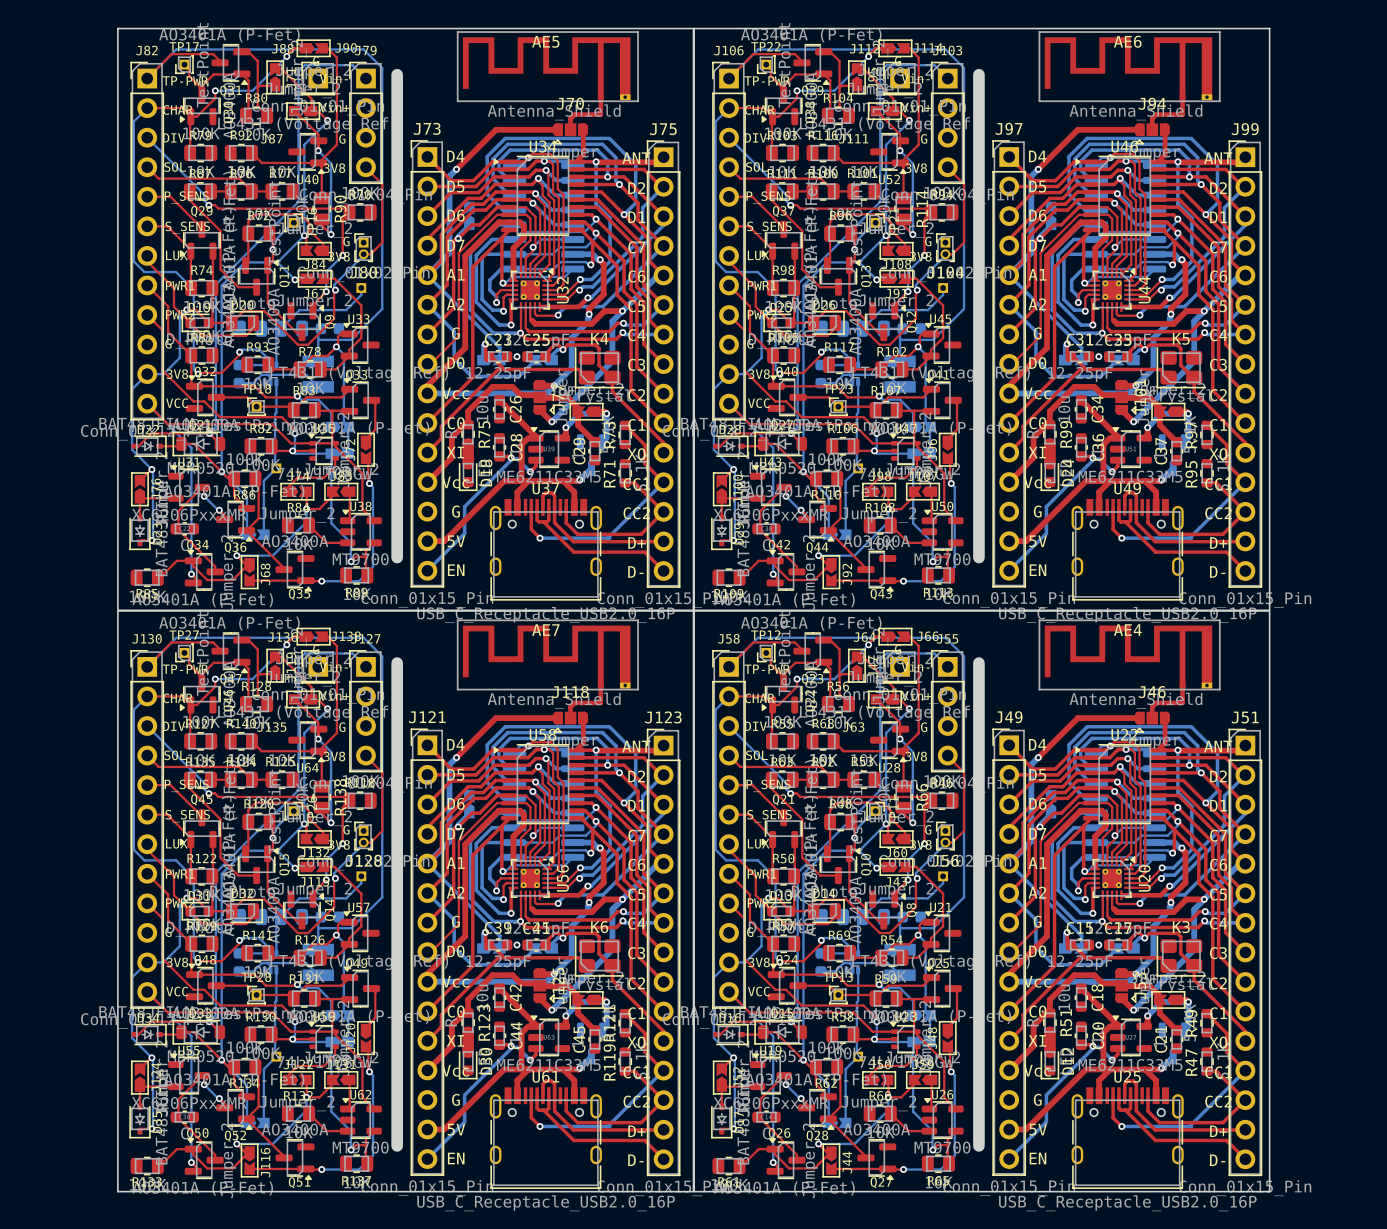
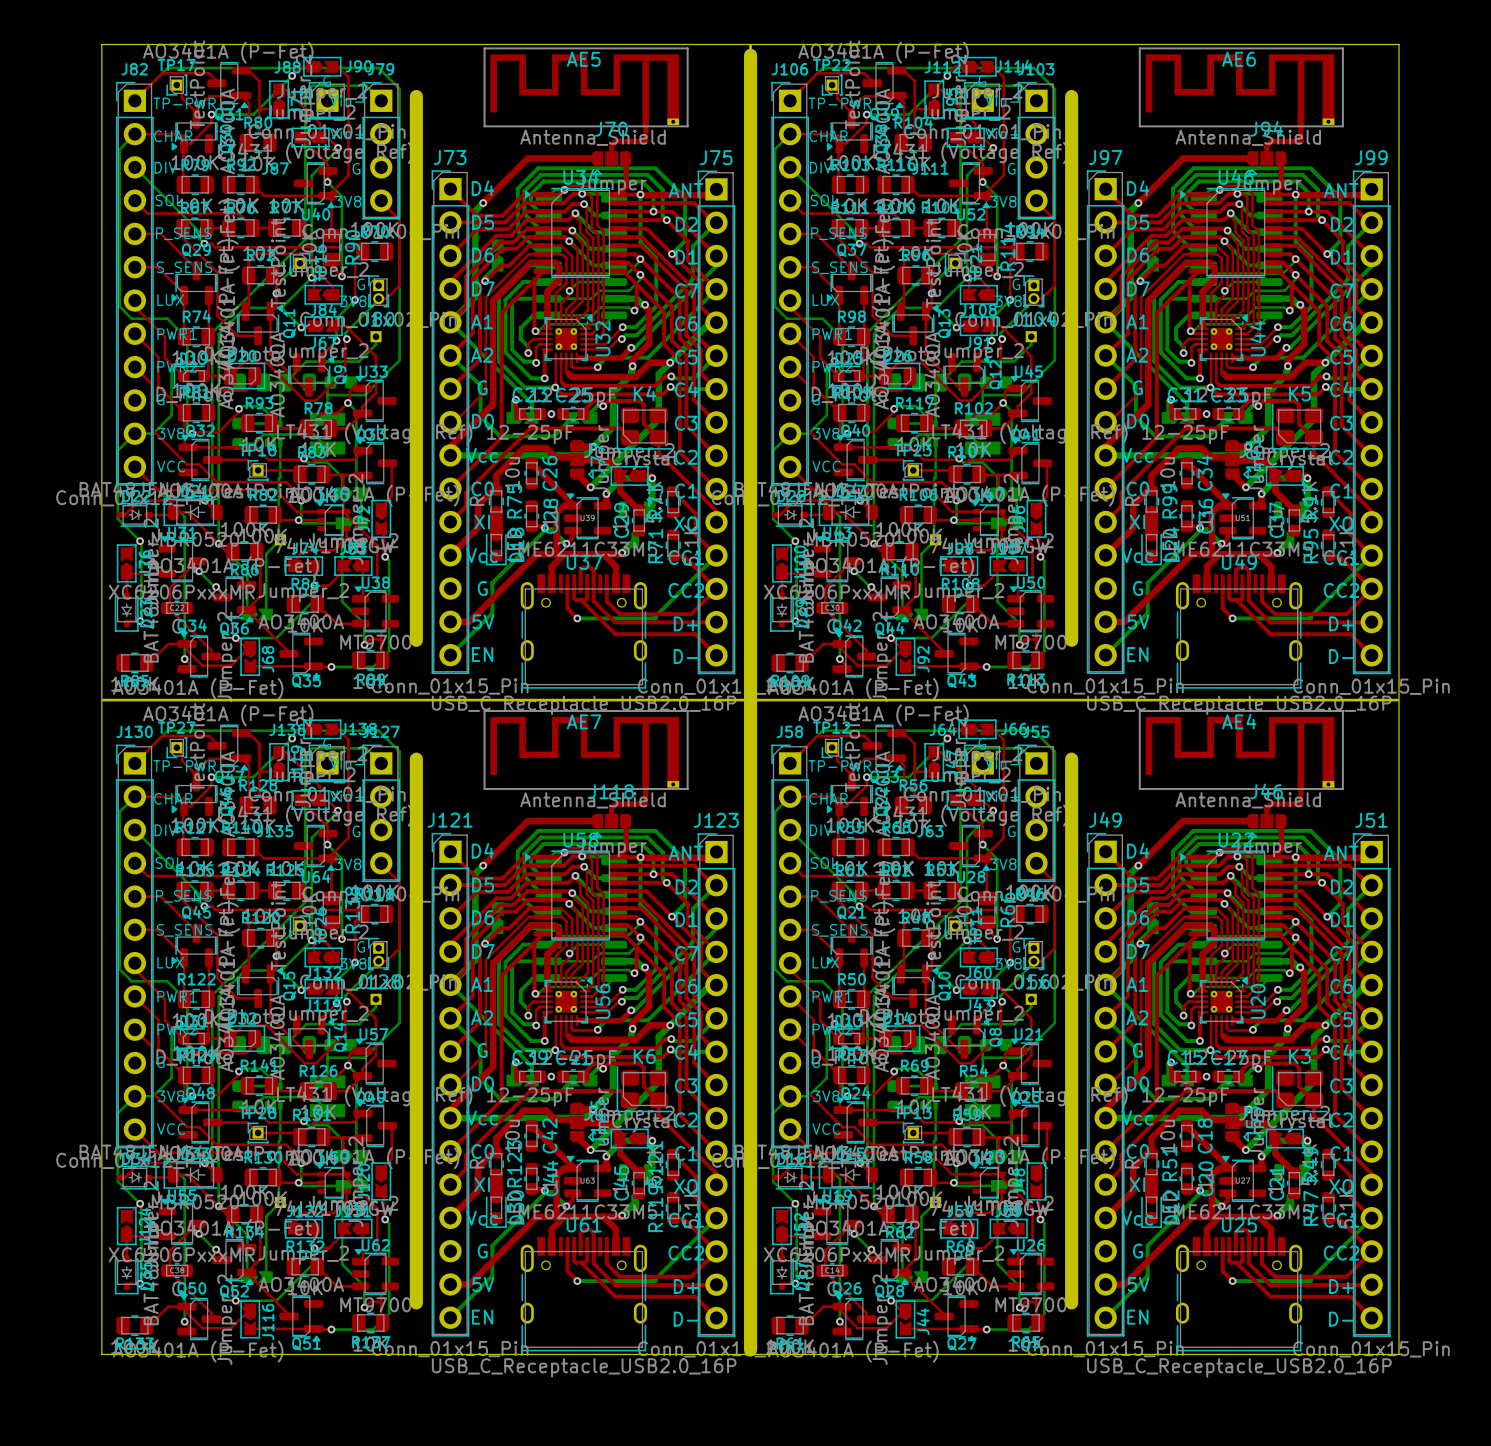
board edge width: thin (693, 29) (693, 1190) -> thick (750, 45) (750, 1353)

